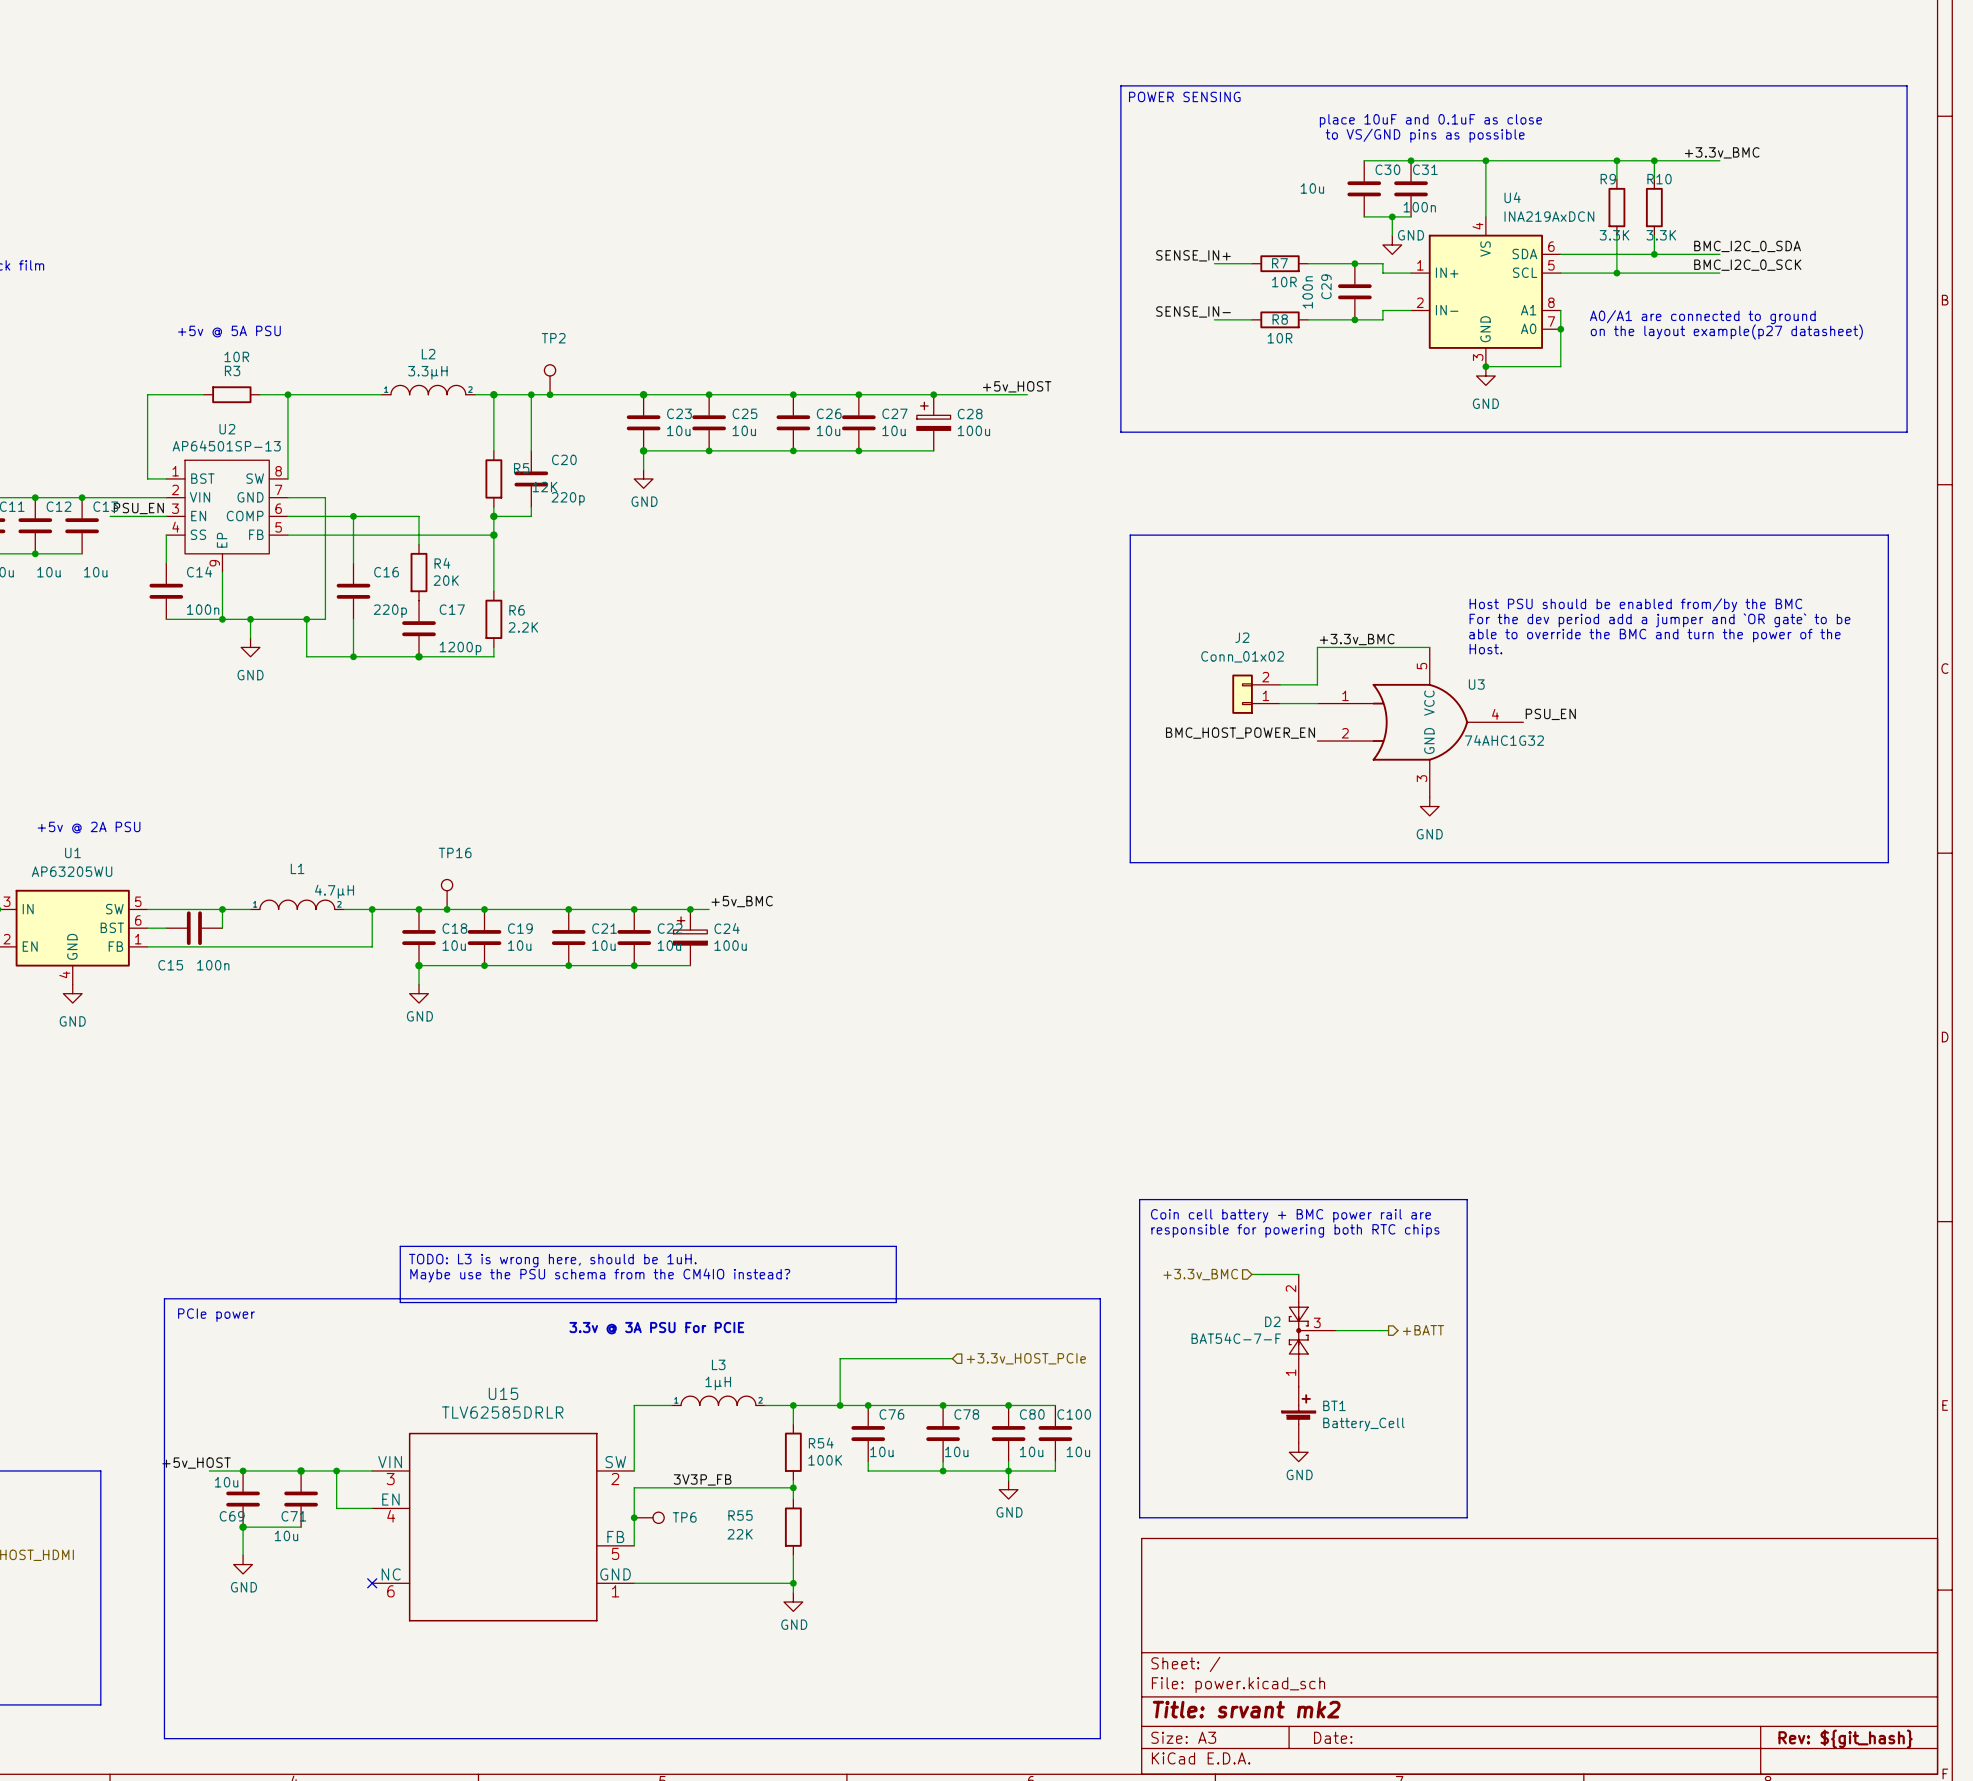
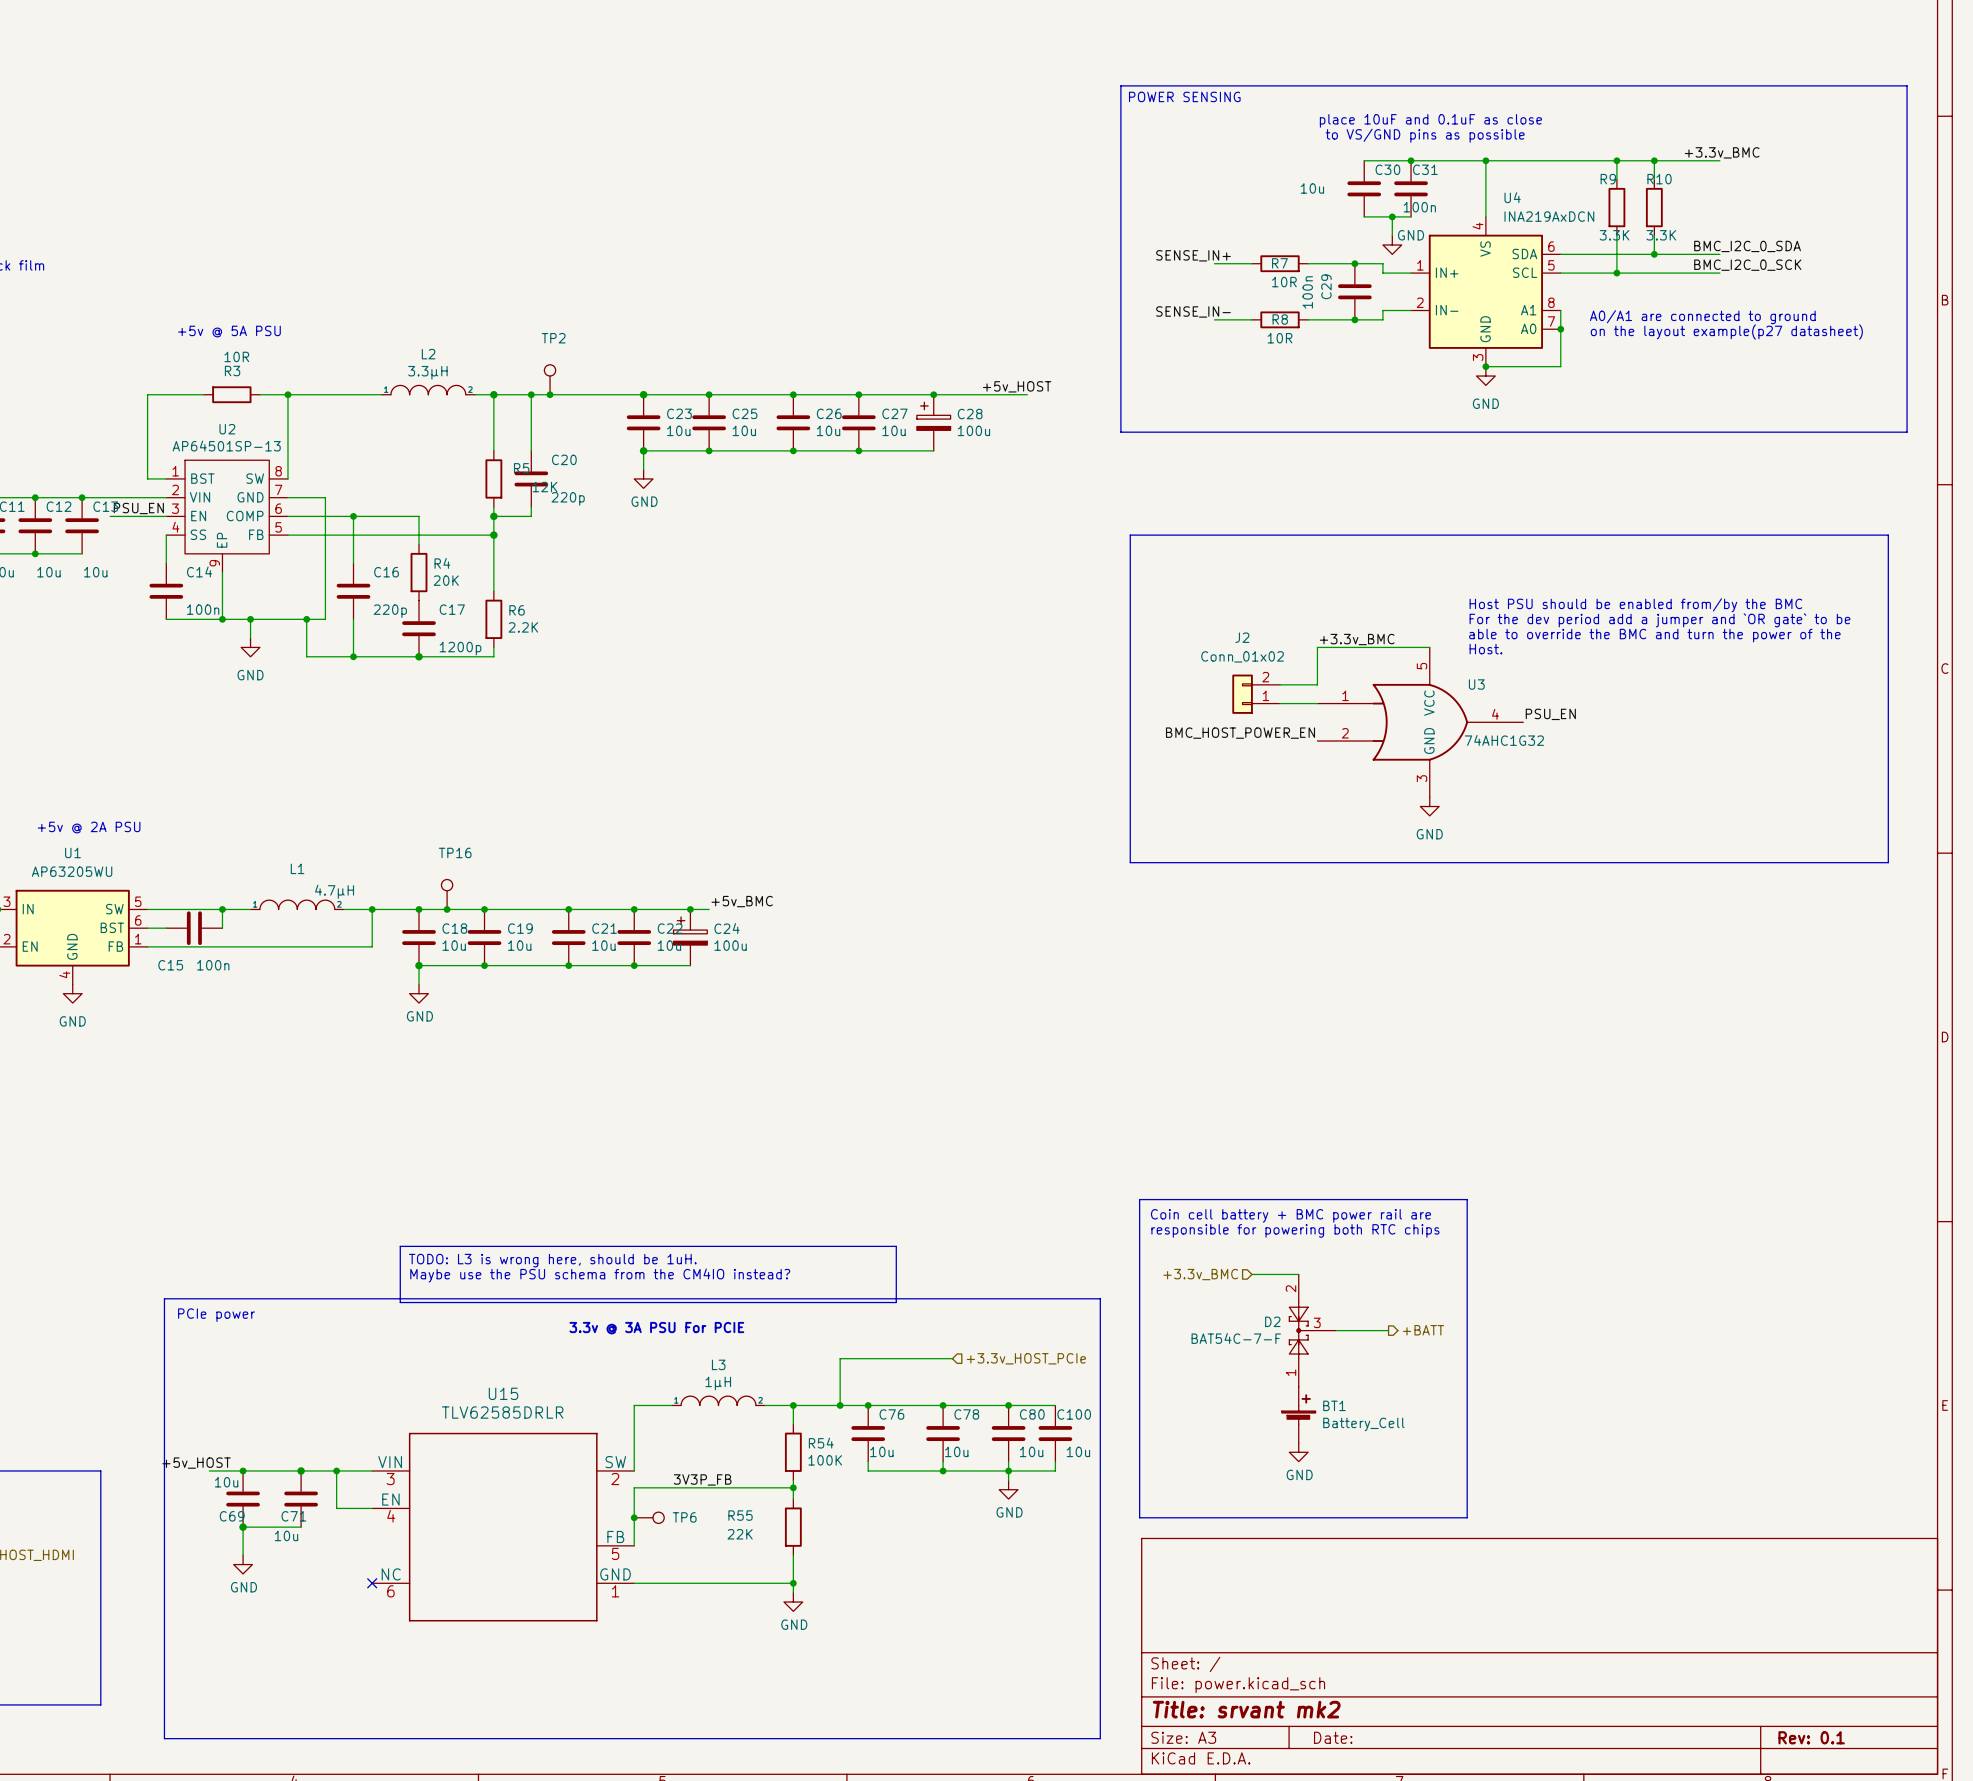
title block: Rev: ${git_hash} (1845, 1739) -> Rev: 0.1 (1811, 1737)

